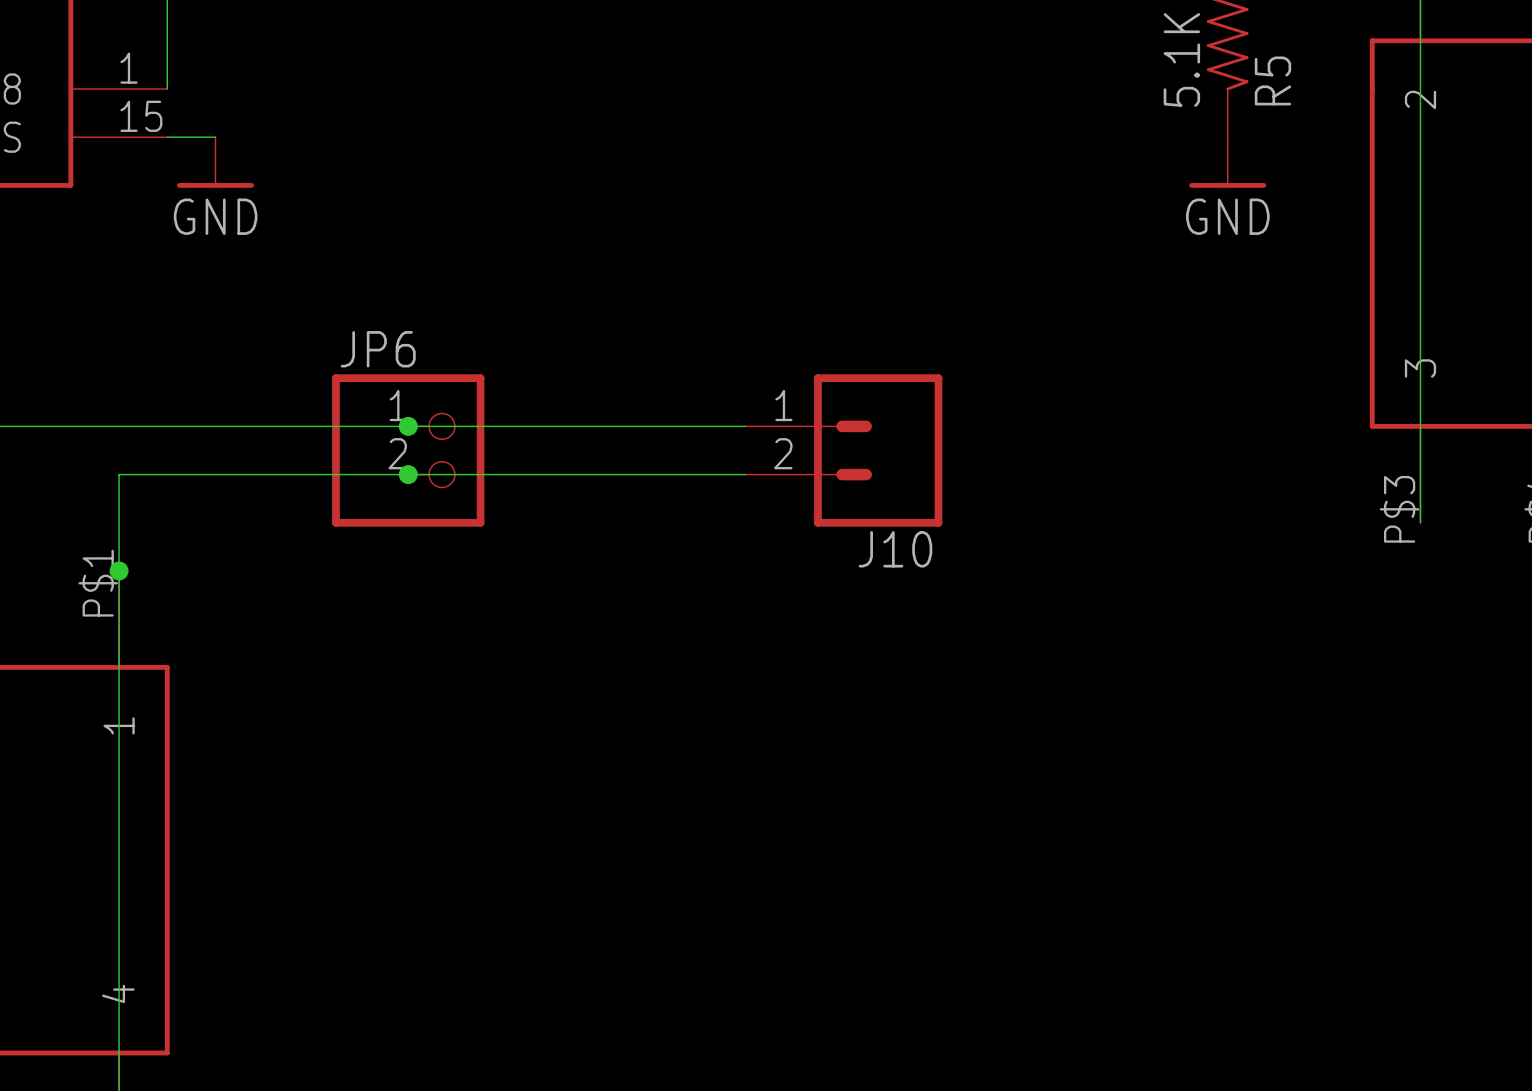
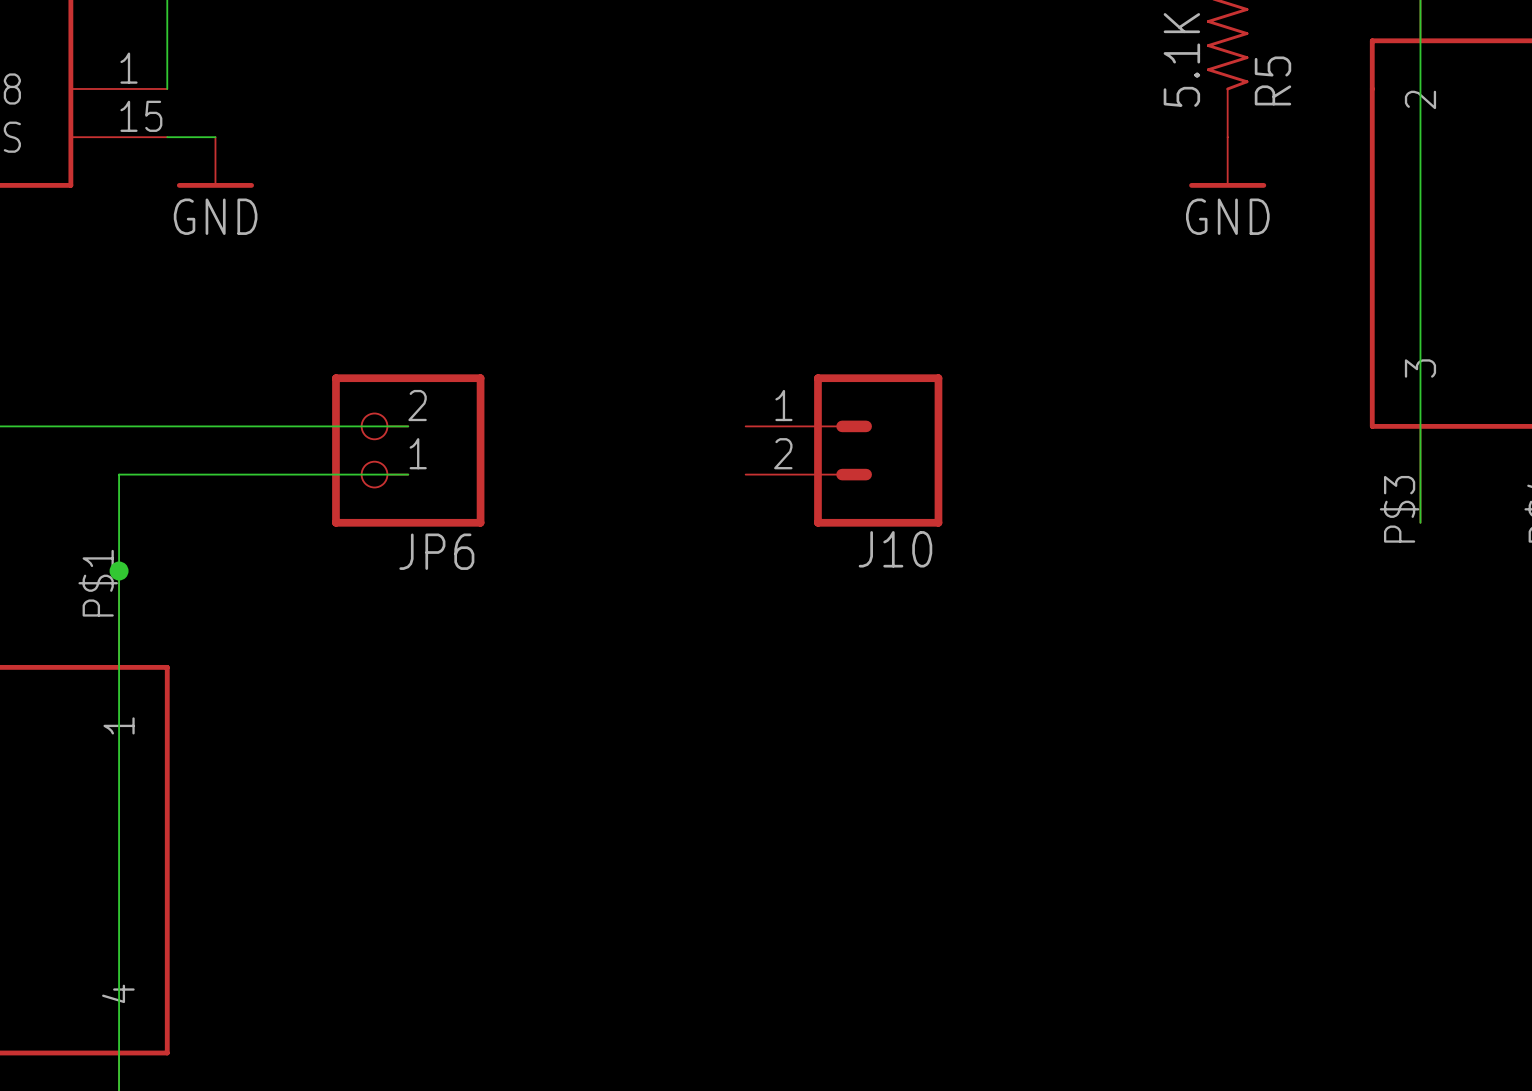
wire: (408, 426) (745, 426) -> none
junction: (408, 426) -> none
JP6 rotation: 0° (408, 450) -> 180° (408, 450)
wire: (408, 474) (745, 474) -> none
junction: (408, 474) -> none

